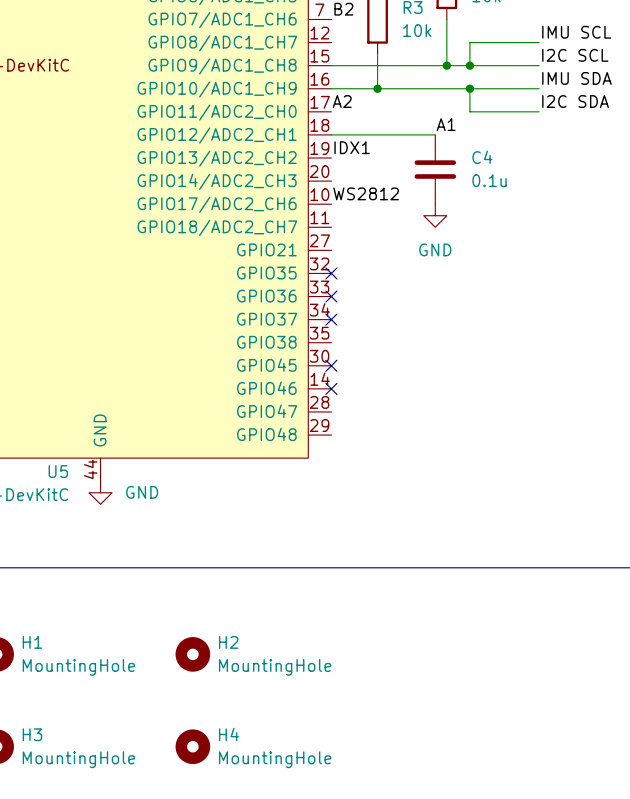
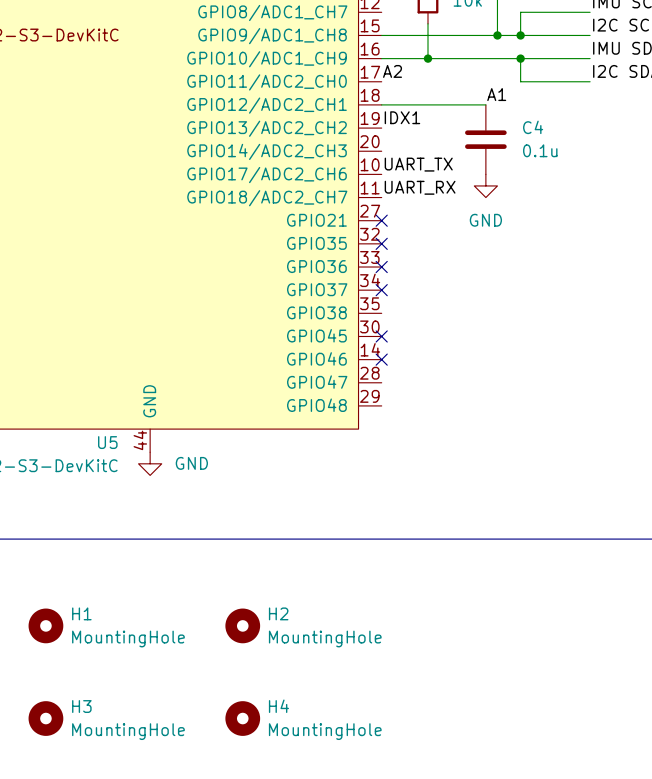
label: WS2812 (366, 193) -> UART_TX (418, 164)
label: none -> UART_RX (420, 187)
no-connect mark: none -> (381, 220)

